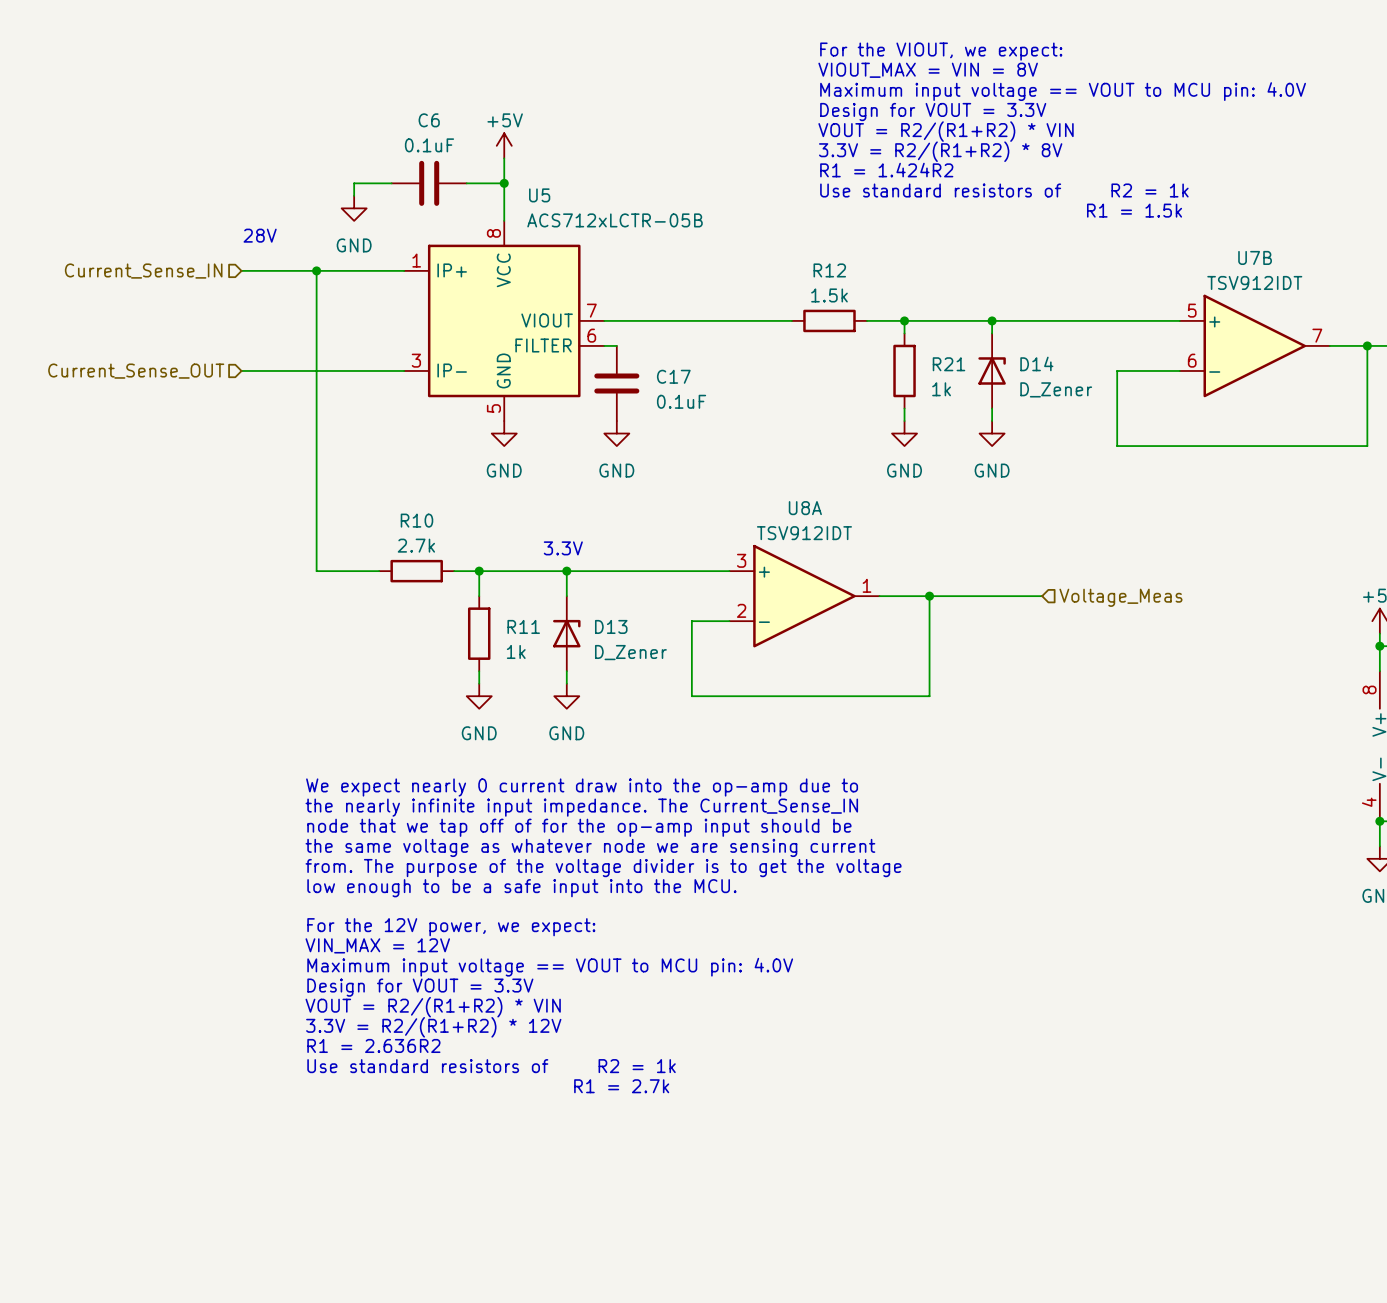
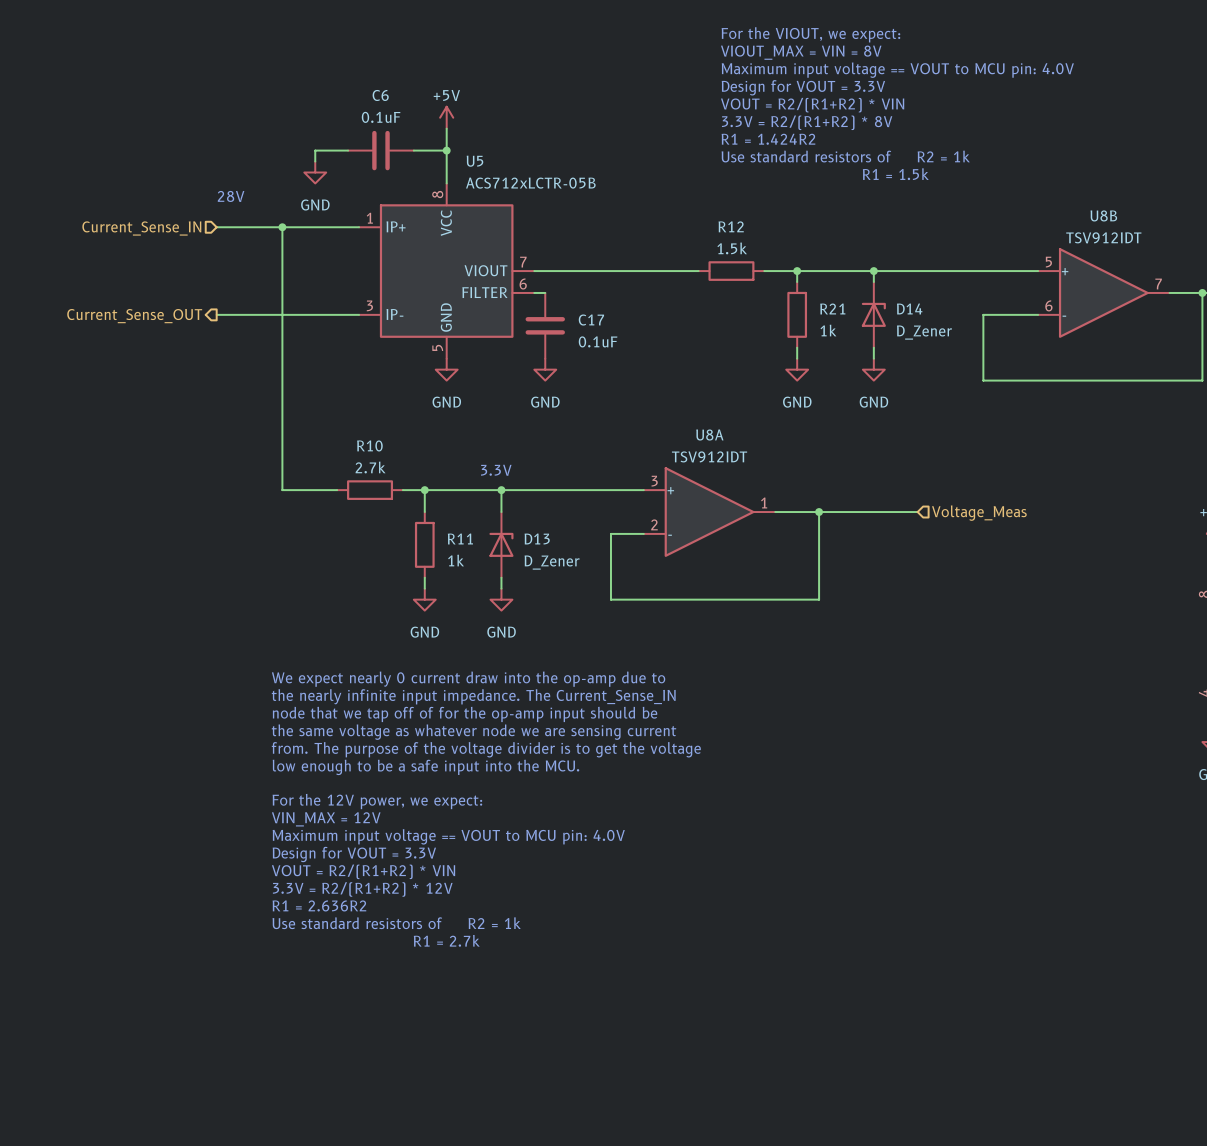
U7B name: U7B (1255, 257) -> U8B (1103, 215)
hierarchical label shape: input (136, 371) -> output (134, 316)

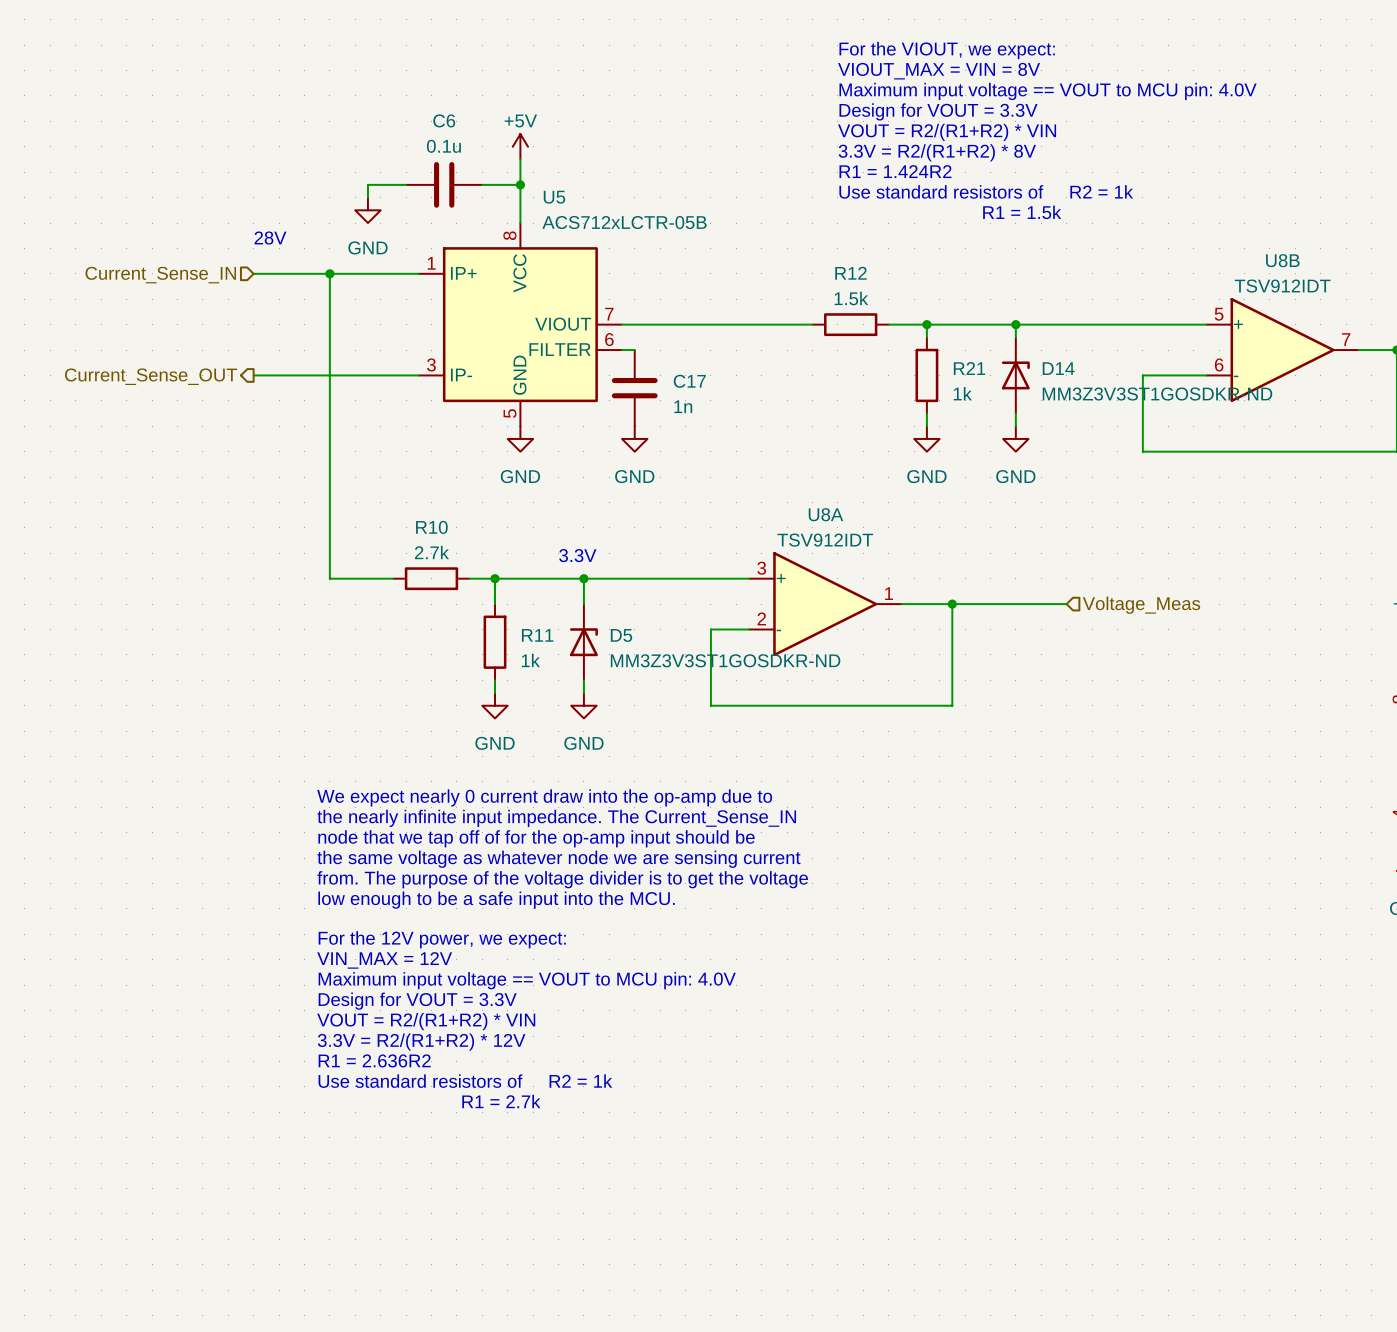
C6 value: 0.1uF (381, 117) -> 0.1u (443, 146)
D14 value: D_Zener (924, 332) -> MM3Z3V3ST1GOSDKR-ND (1157, 394)
C17 value: 0.1uF (598, 341) -> 1n (683, 406)
D13 name: D13 (537, 538) -> D5 (621, 635)
D13 value: D_Zener (552, 562) -> MM3Z3V3ST1GOSDKR-ND (725, 660)

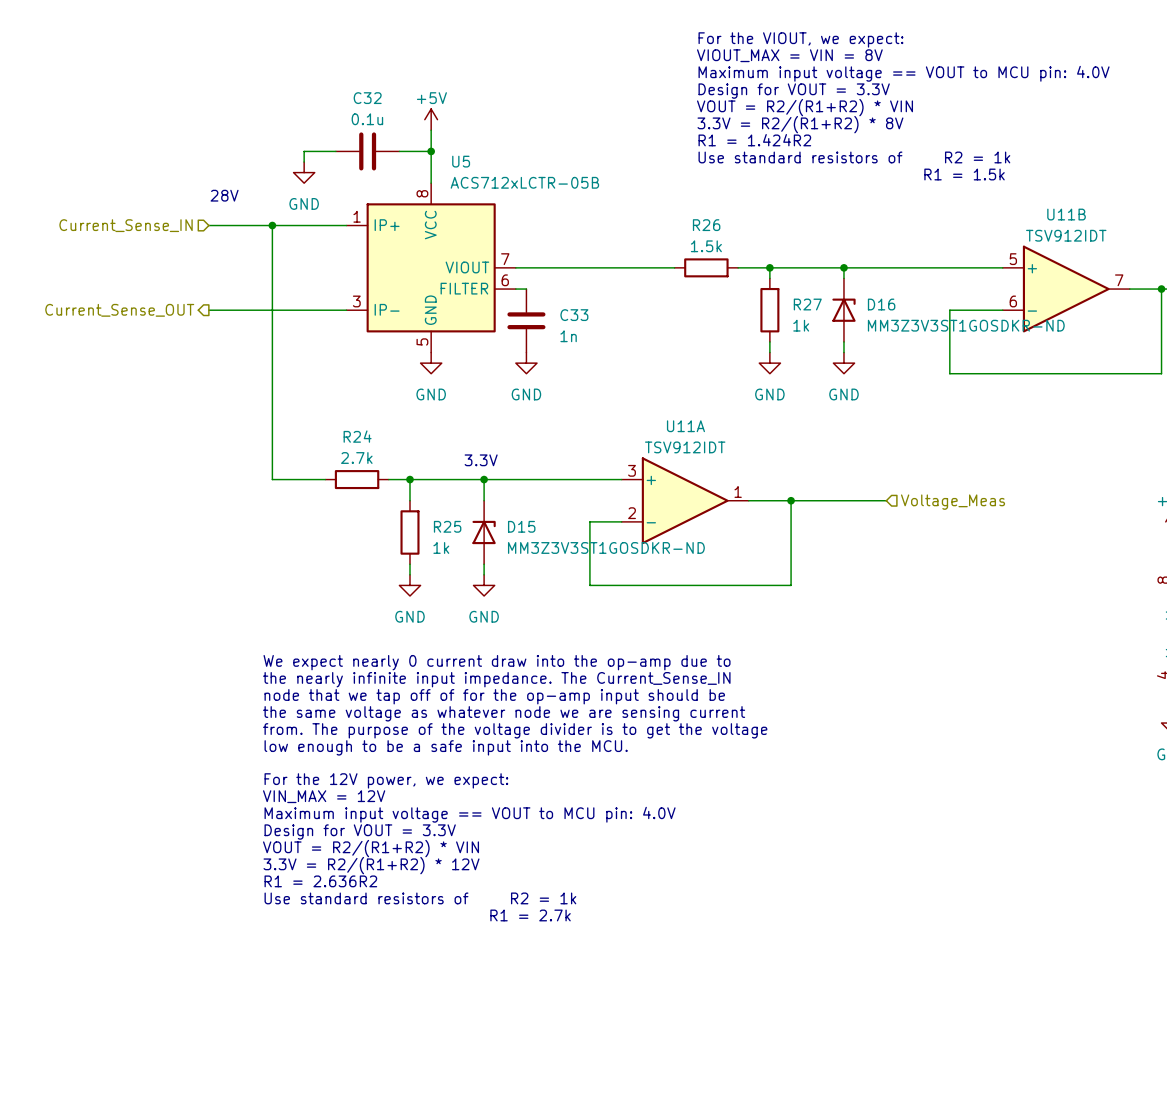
C6 name: C6 (444, 120) -> C32 (367, 98)
U8B name: U8B (1282, 260) -> U11B (1066, 214)
R12 name: R12 (850, 273) -> R26 (706, 225)
R21 name: R21 (969, 368) -> R27 (807, 304)
D14 name: D14 (1058, 368) -> D16 (881, 304)
C17 name: C17 (689, 381) -> C33 (574, 315)
U8A name: U8A (825, 514) -> U11A (685, 426)
R10 name: R10 (431, 527) -> R24 (357, 436)
R11 name: R11 (537, 635) -> R25 (447, 526)
D5 name: D5 (621, 635) -> D15 (521, 526)

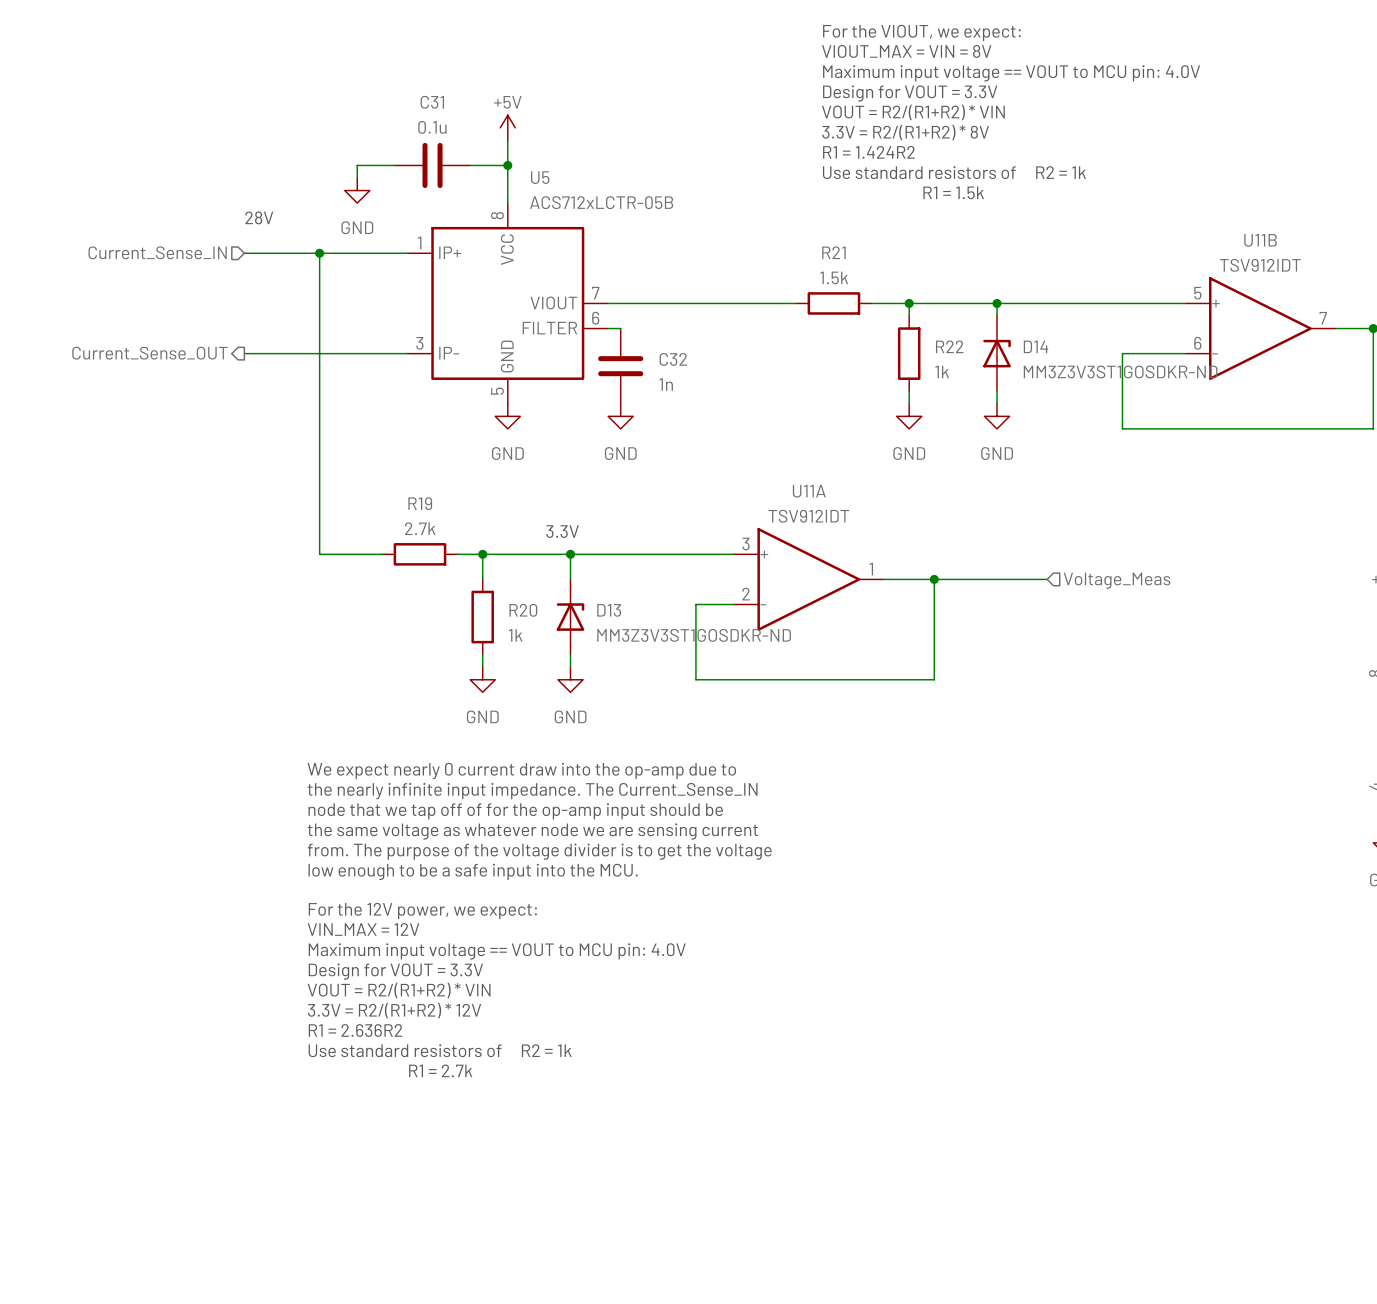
C32 name: C32 (367, 98) -> C31 (432, 102)
R26 name: R26 (706, 225) -> R21 (833, 252)
R27 name: R27 (807, 304) -> R22 (949, 346)
D16 name: D16 (881, 304) -> D14 (1036, 346)
C33 name: C33 (574, 315) -> C32 (673, 359)
R24 name: R24 (357, 436) -> R19 (420, 503)
R25 name: R25 (447, 526) -> R20 (523, 610)
D15 name: D15 (521, 526) -> D13 (609, 610)

